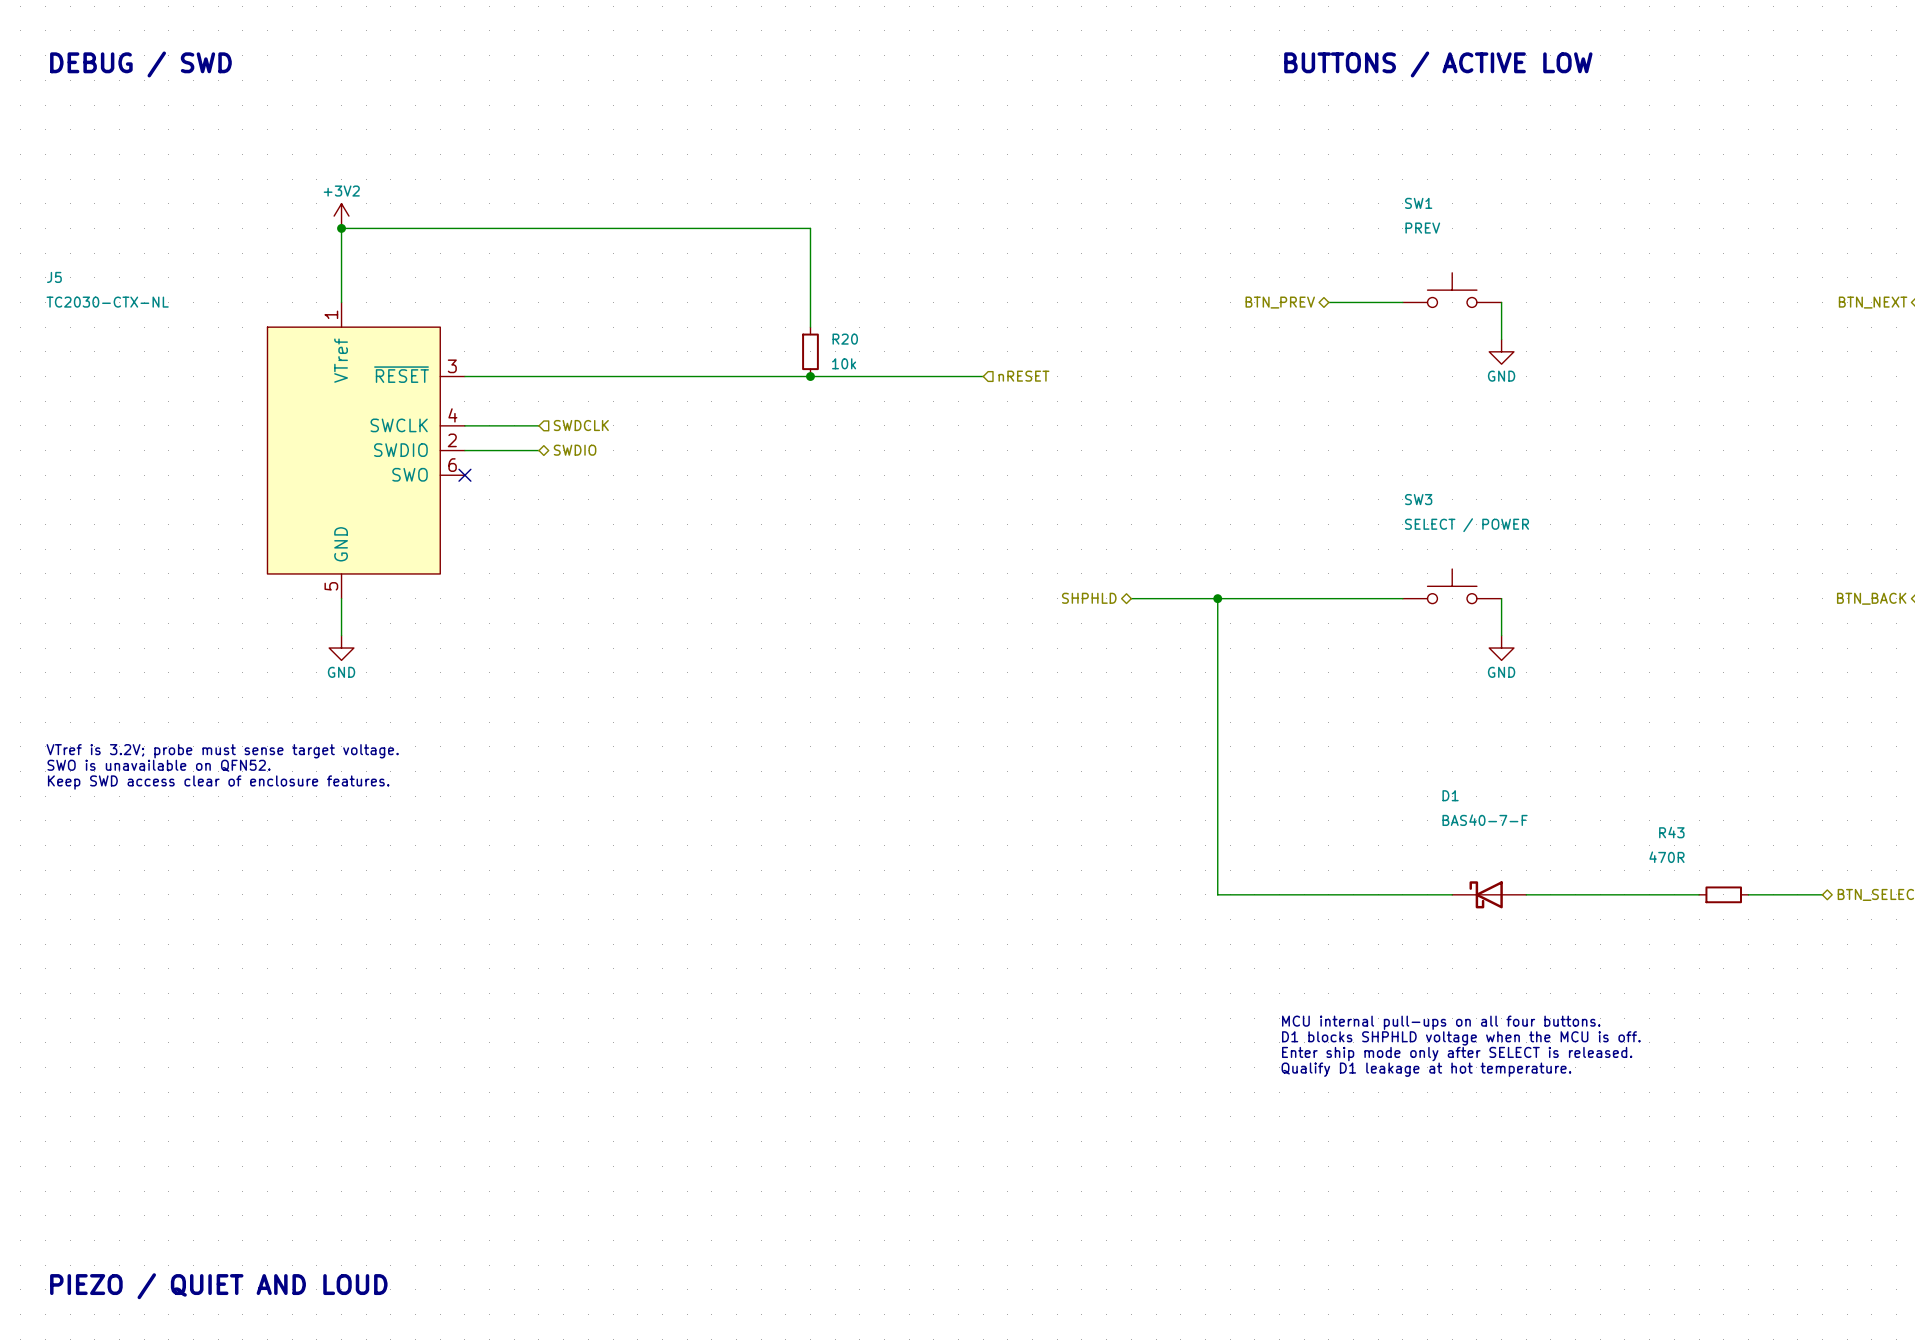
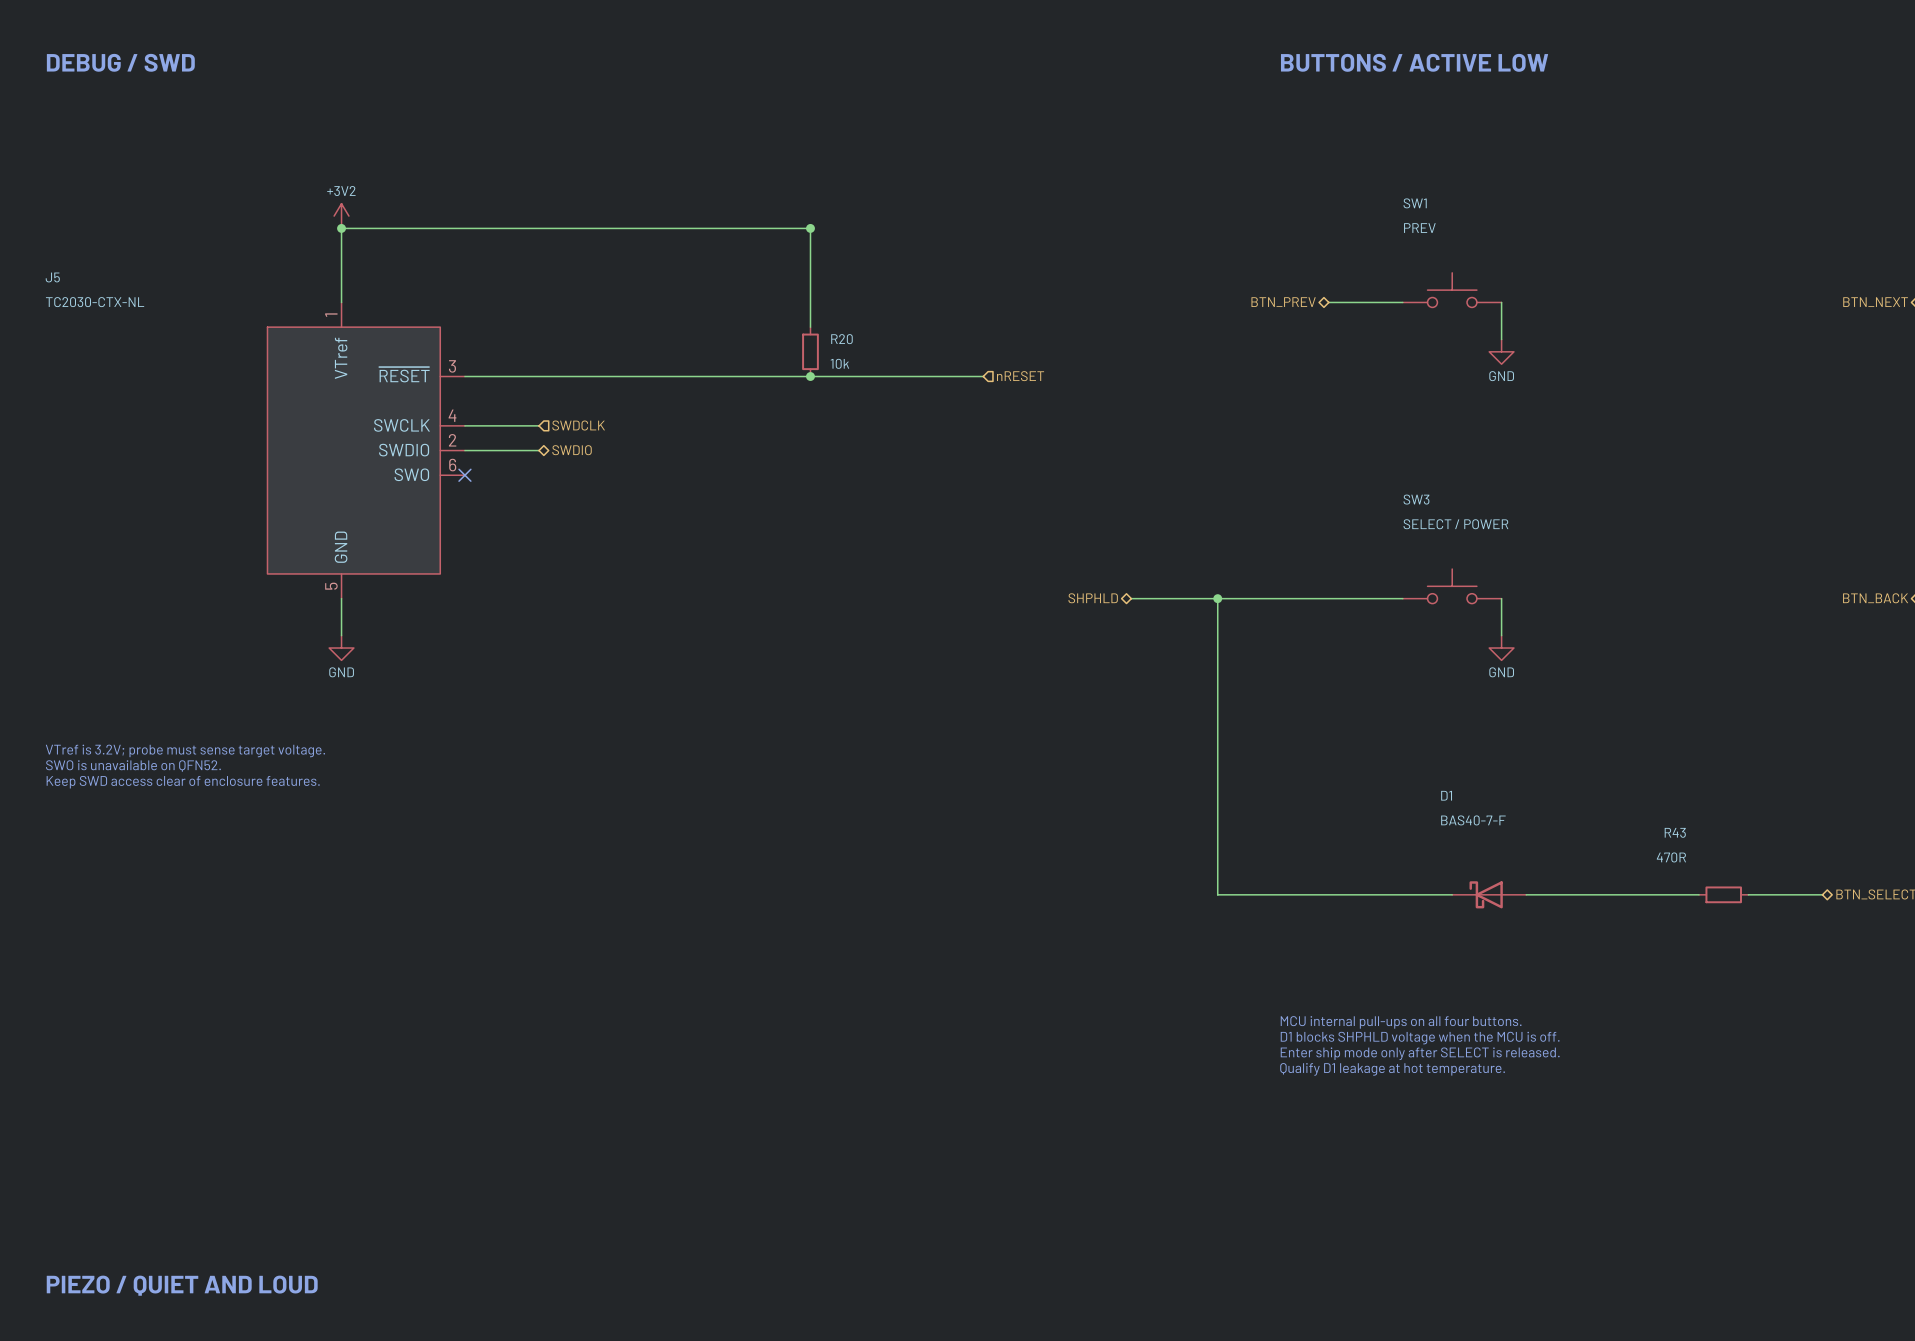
junction: none -> (810, 228)

